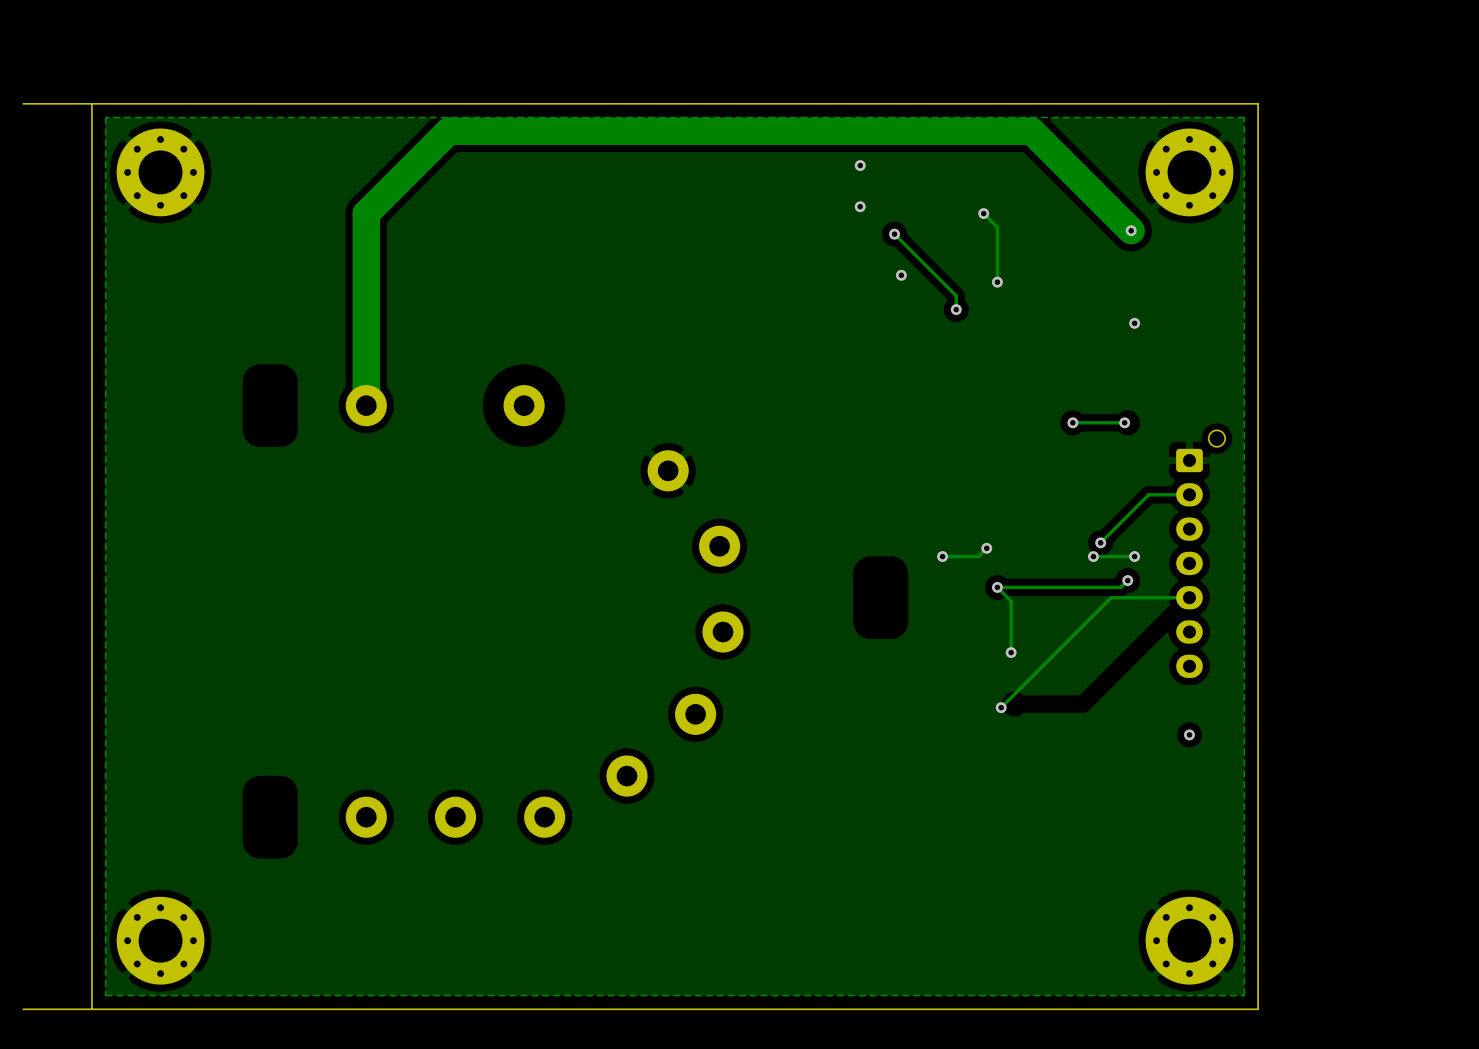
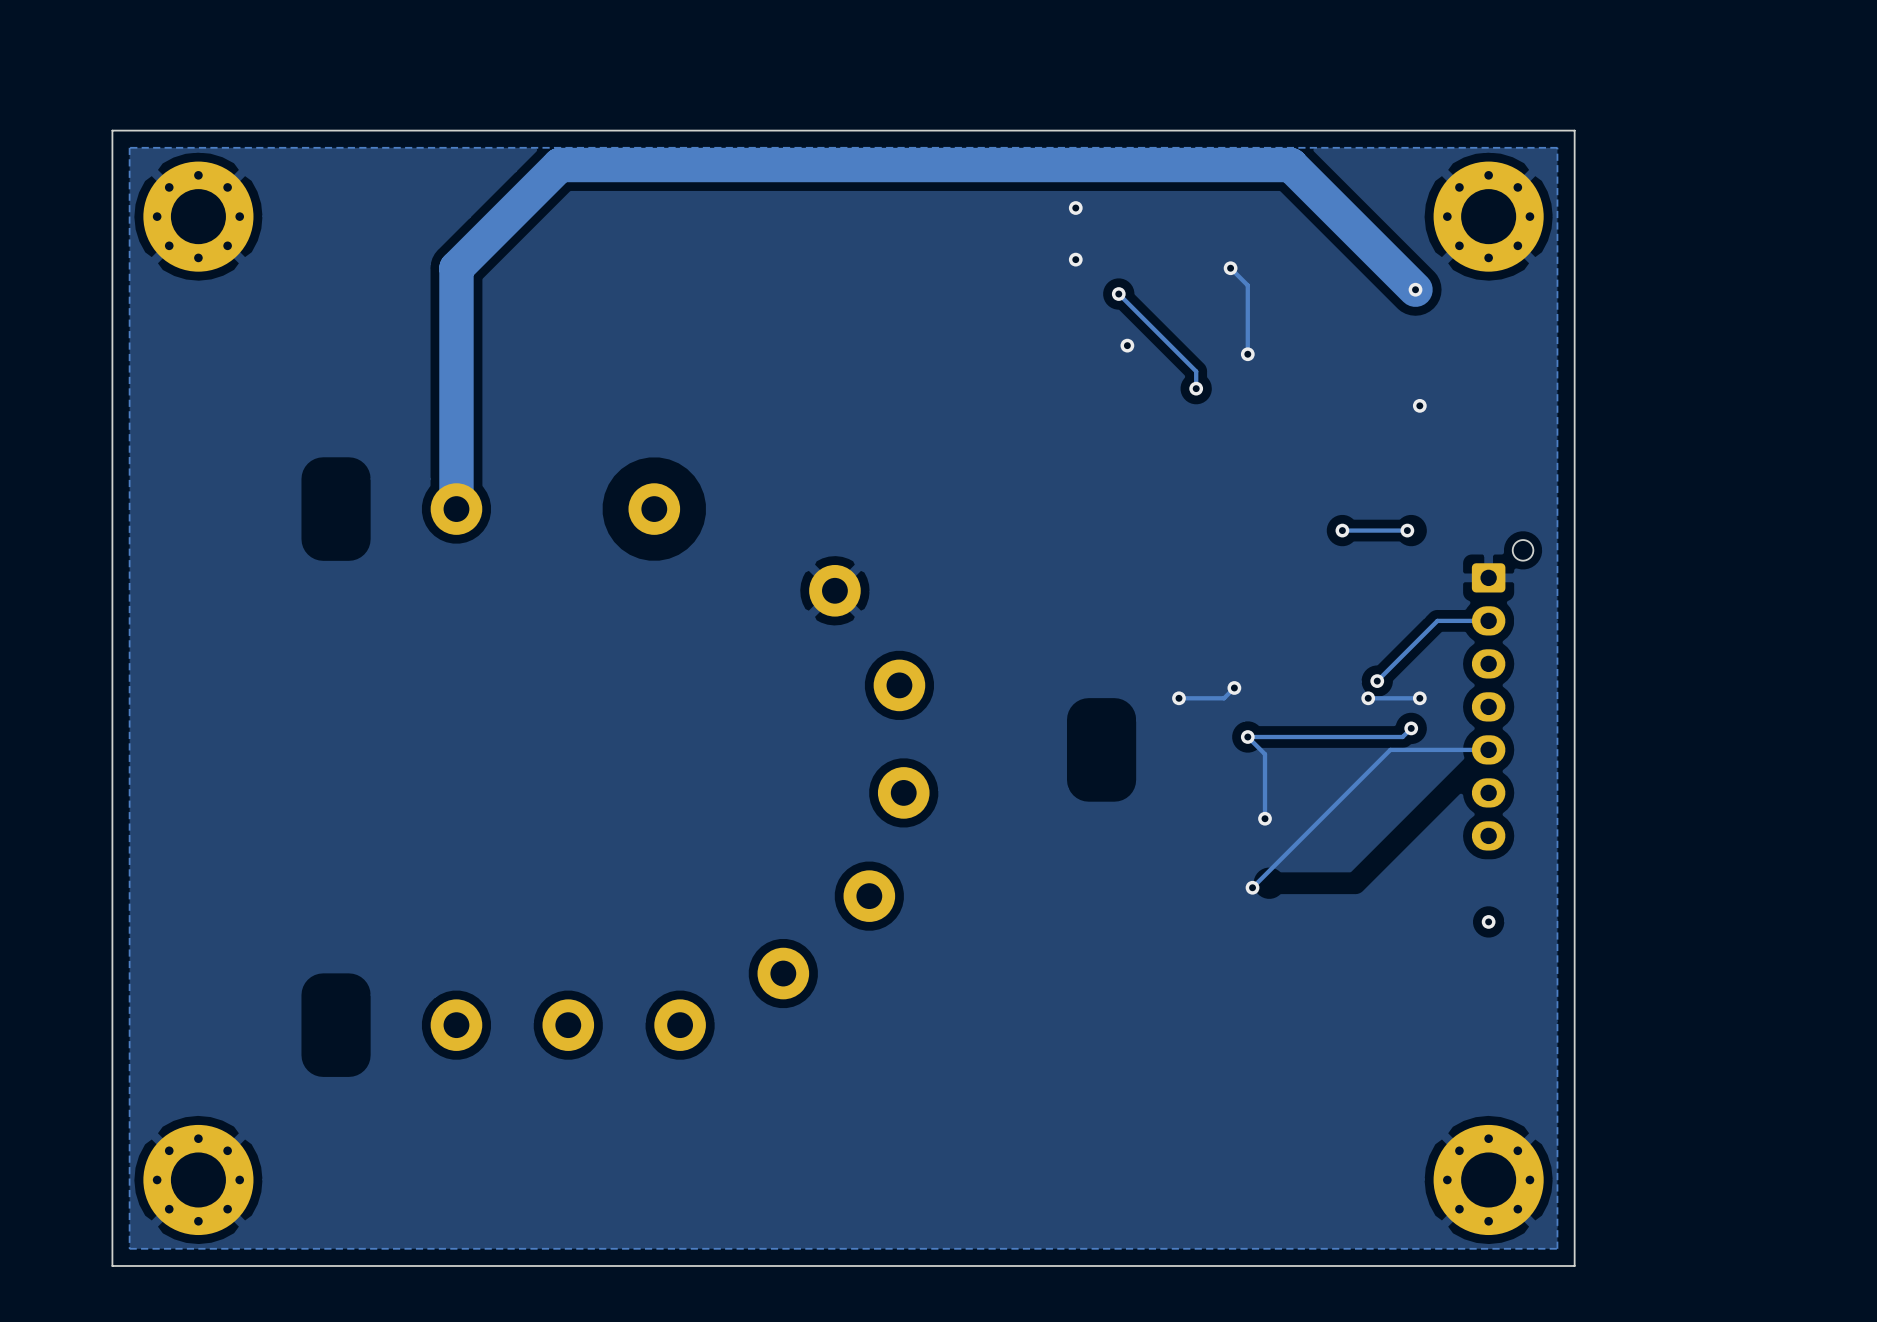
board edge: (91, 103) (23, 103) -> none
board edge: (91, 1009) (23, 1009) -> none

